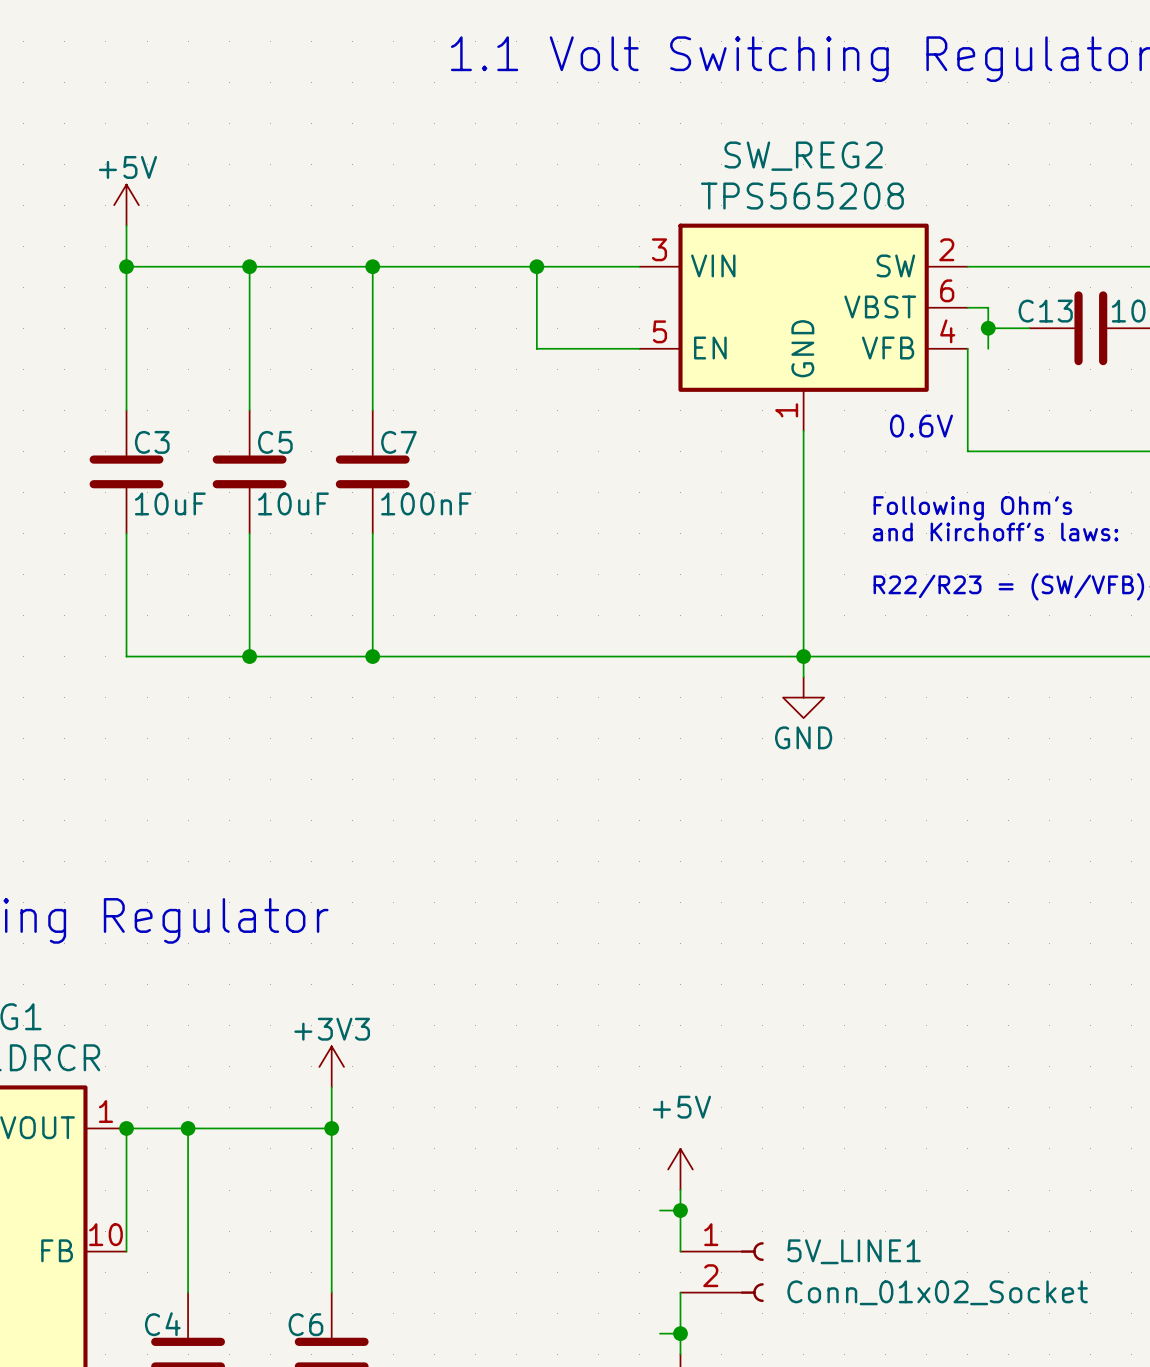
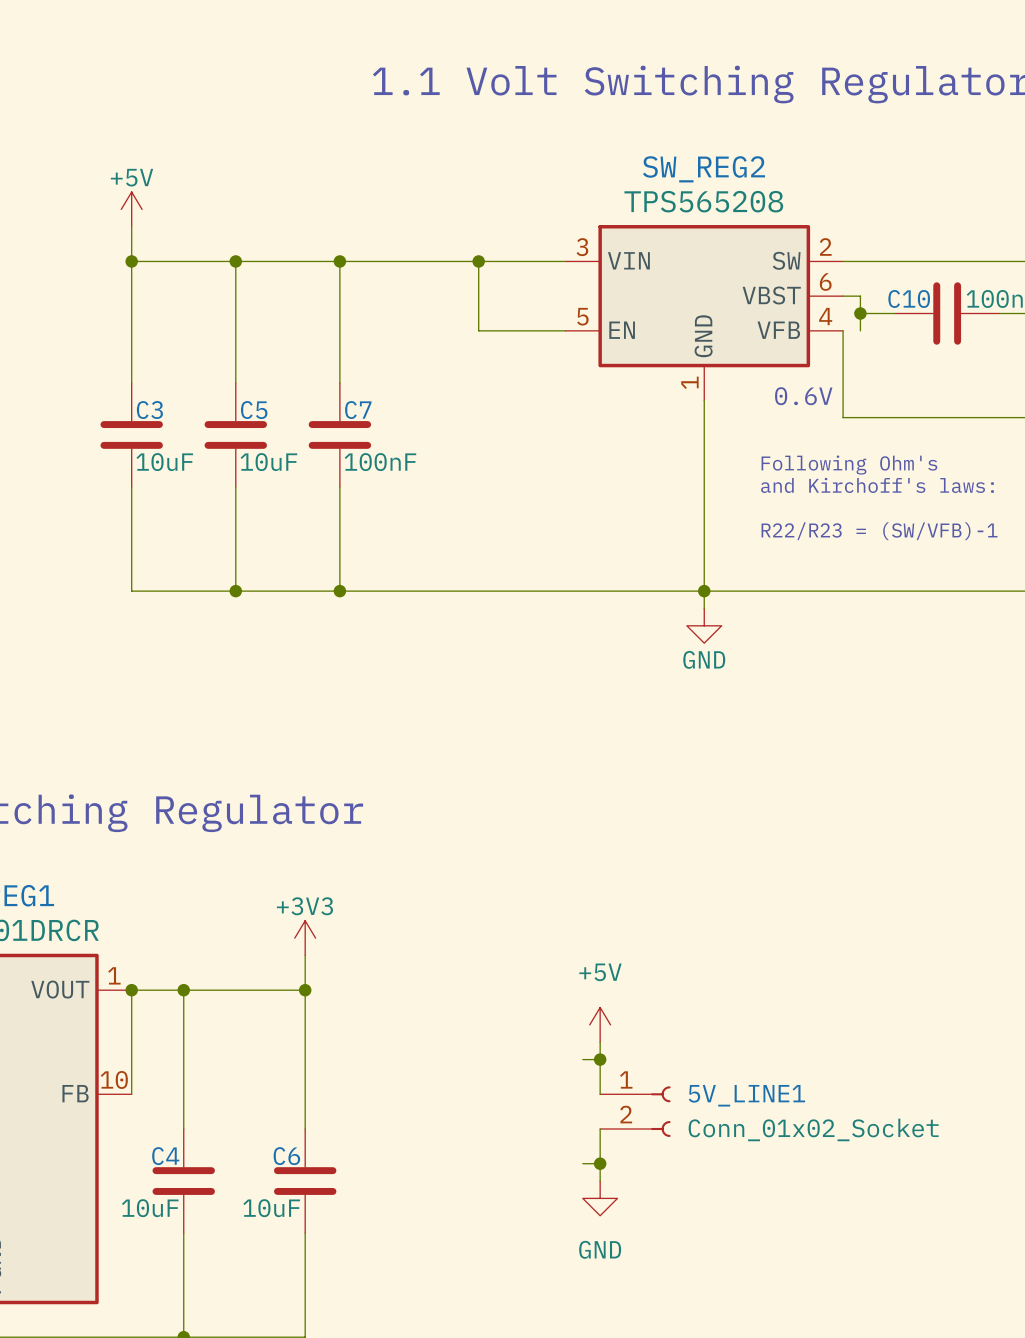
C13 name: C13 (1045, 311) -> C10 (909, 298)

